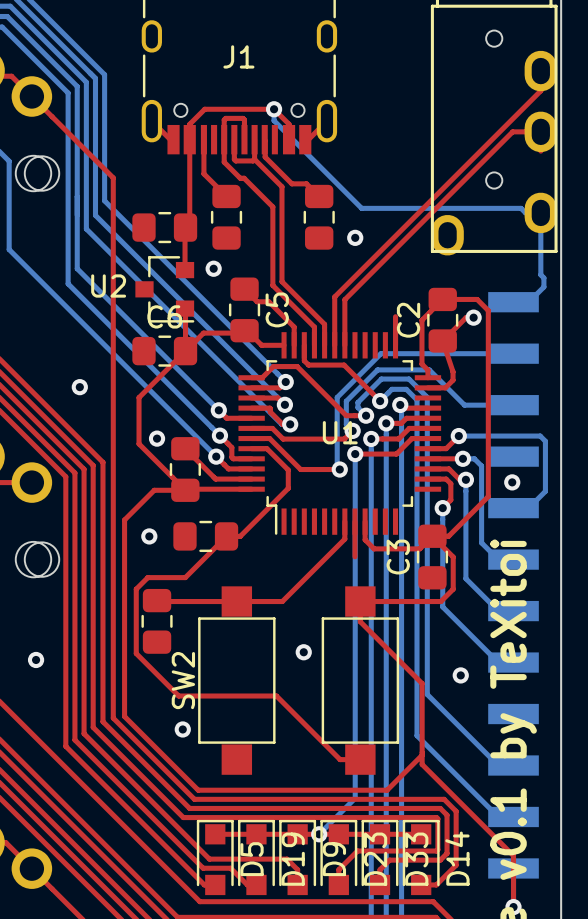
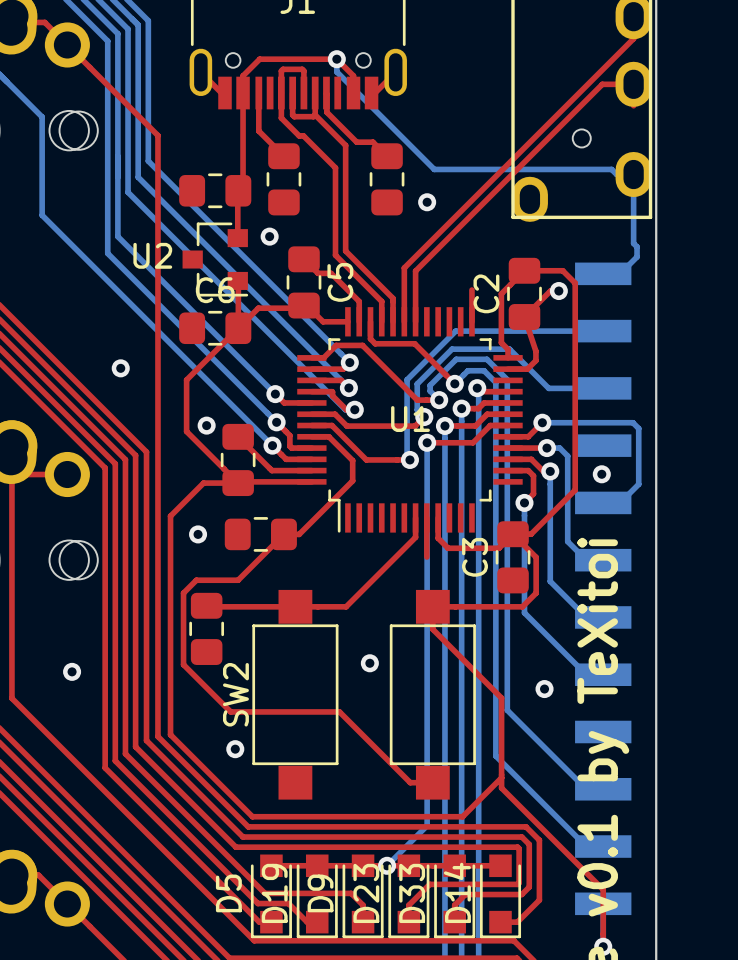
D5 rotation: 0° (215, 857) -> 180° (271, 896)
D19 rotation: 0° (256, 857) -> 180° (317, 896)
D9 rotation: 0° (297, 857) -> 180° (363, 896)
D23 rotation: 0° (338, 857) -> 180° (408, 896)
D33 rotation: 0° (380, 857) -> 180° (454, 896)
D14 rotation: 0° (421, 857) -> 180° (500, 896)

